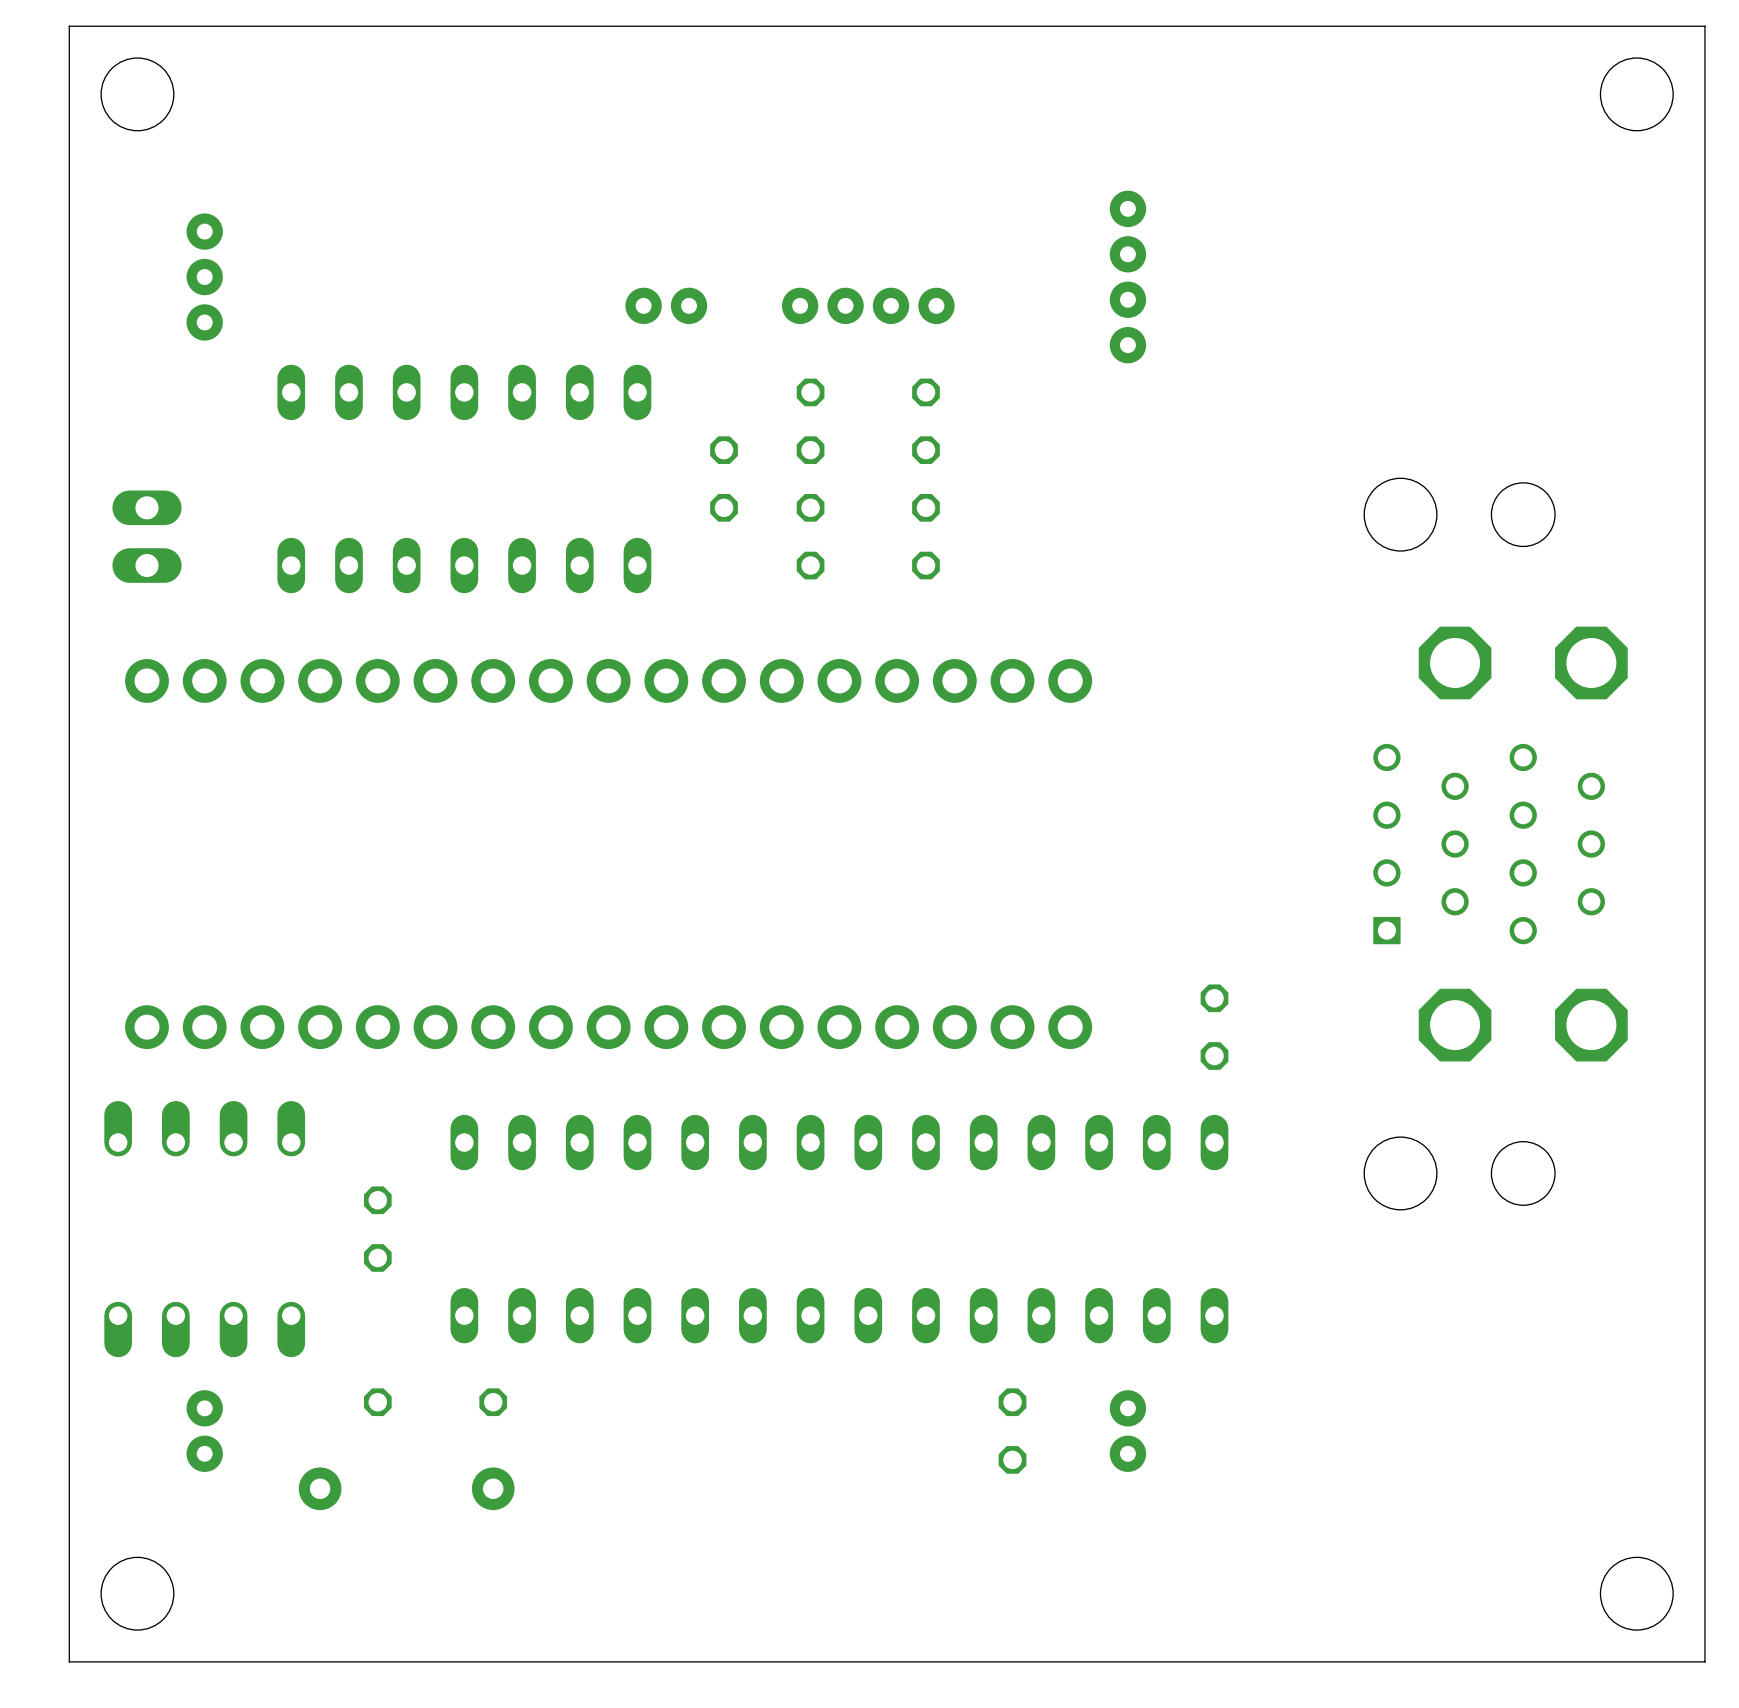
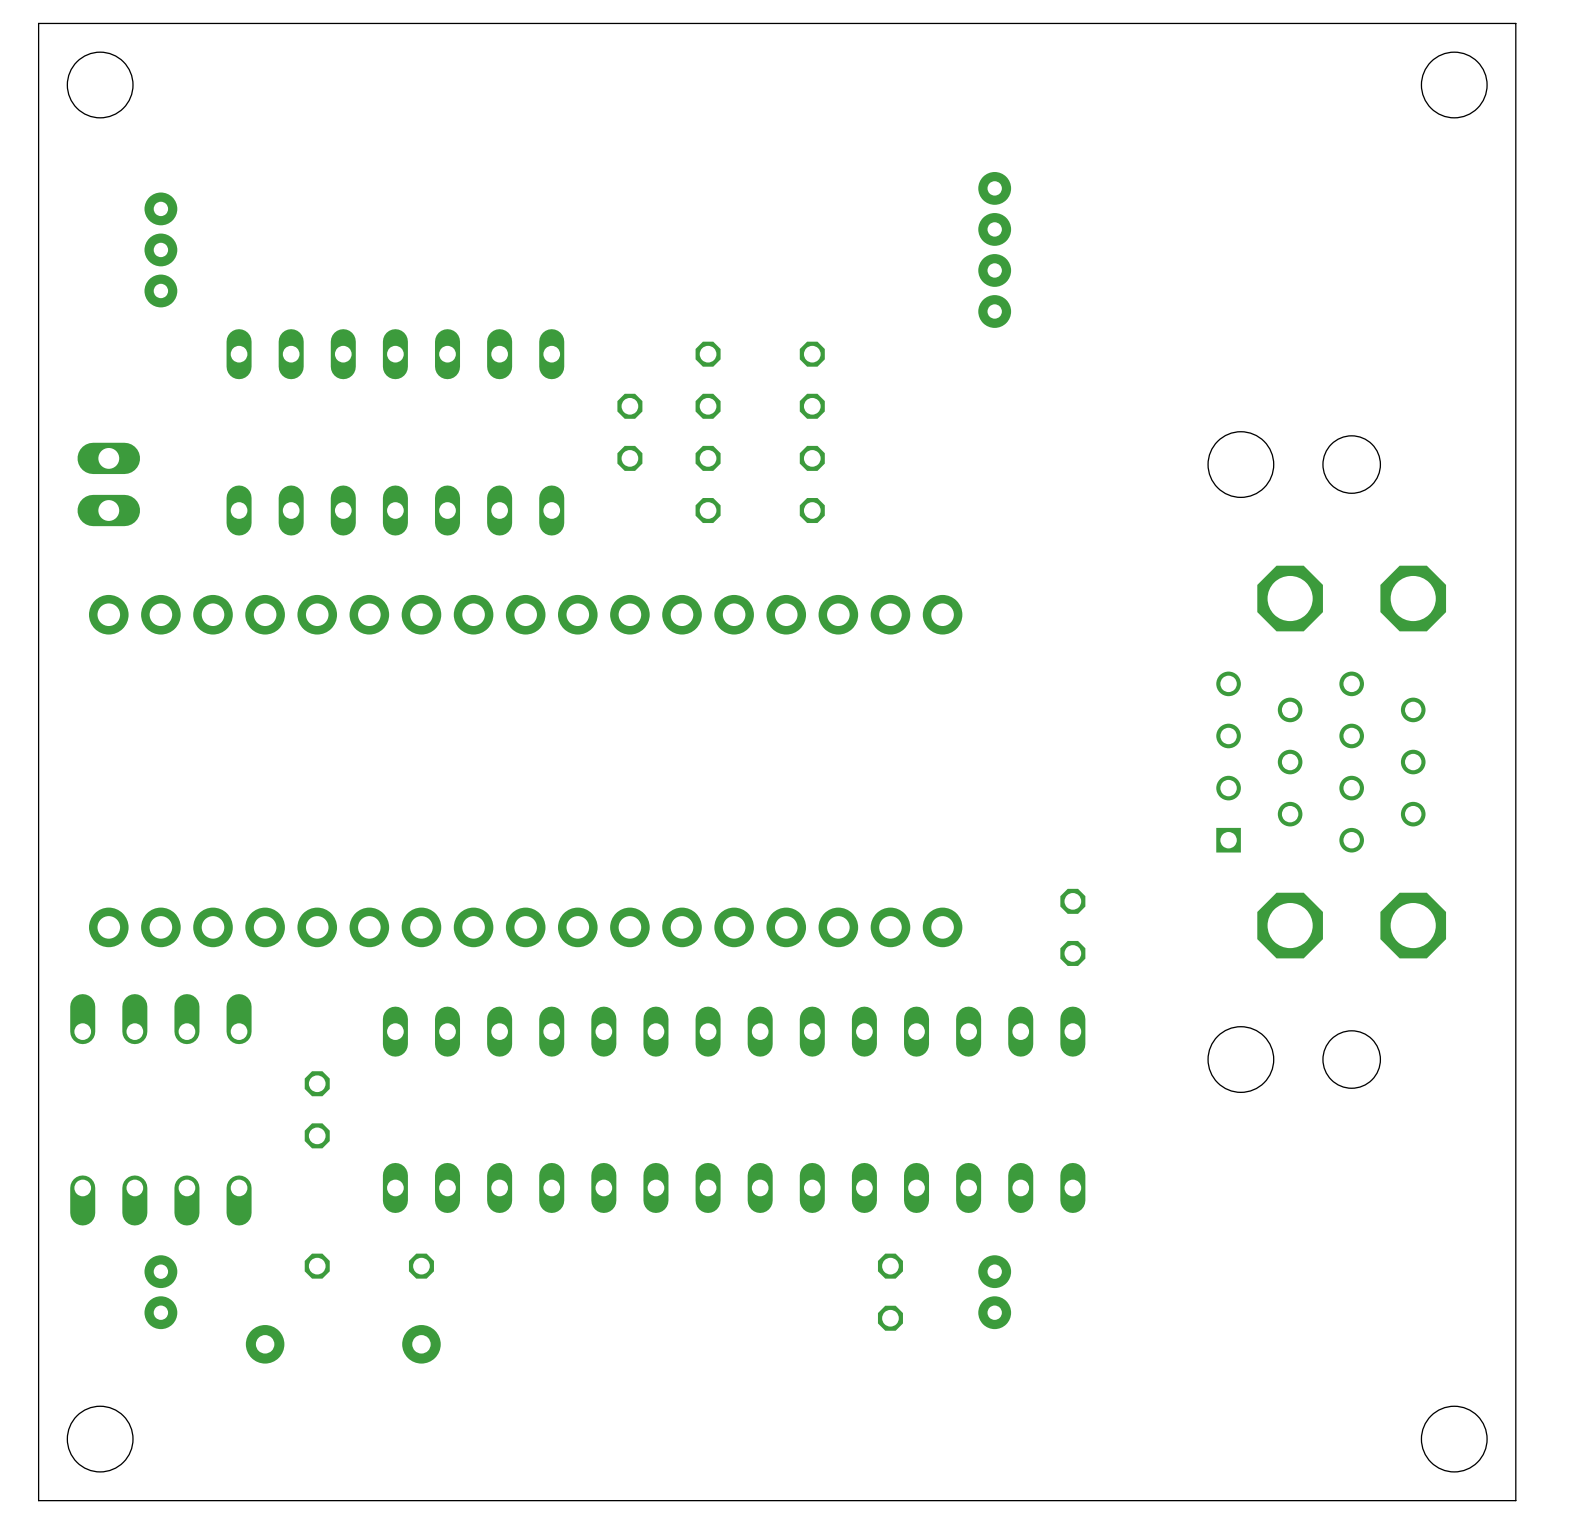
part: (666, 305) -> none
part: (868, 305) -> none

